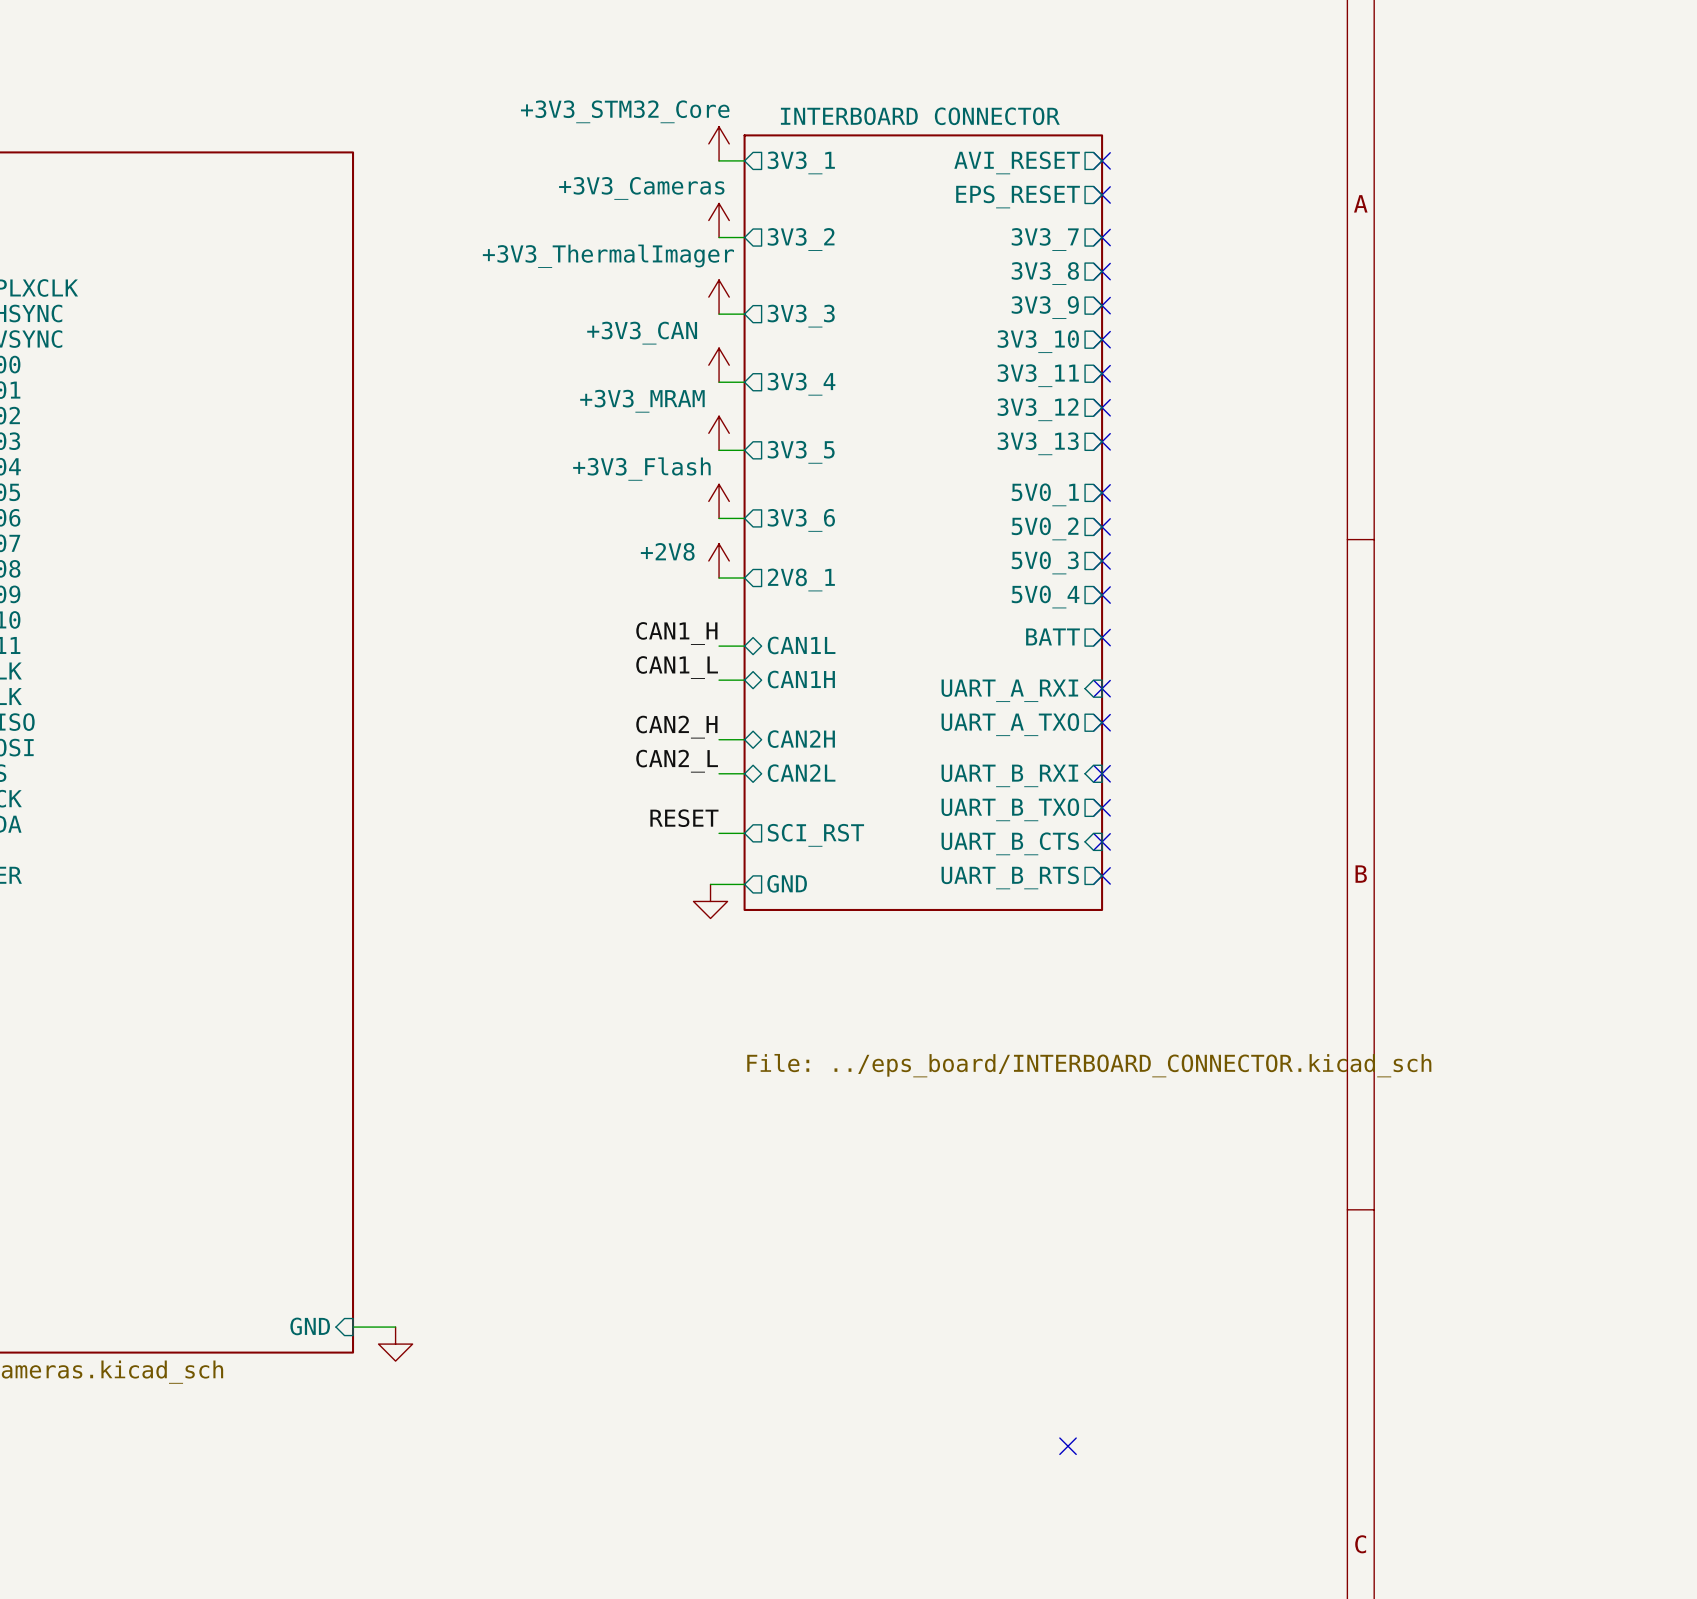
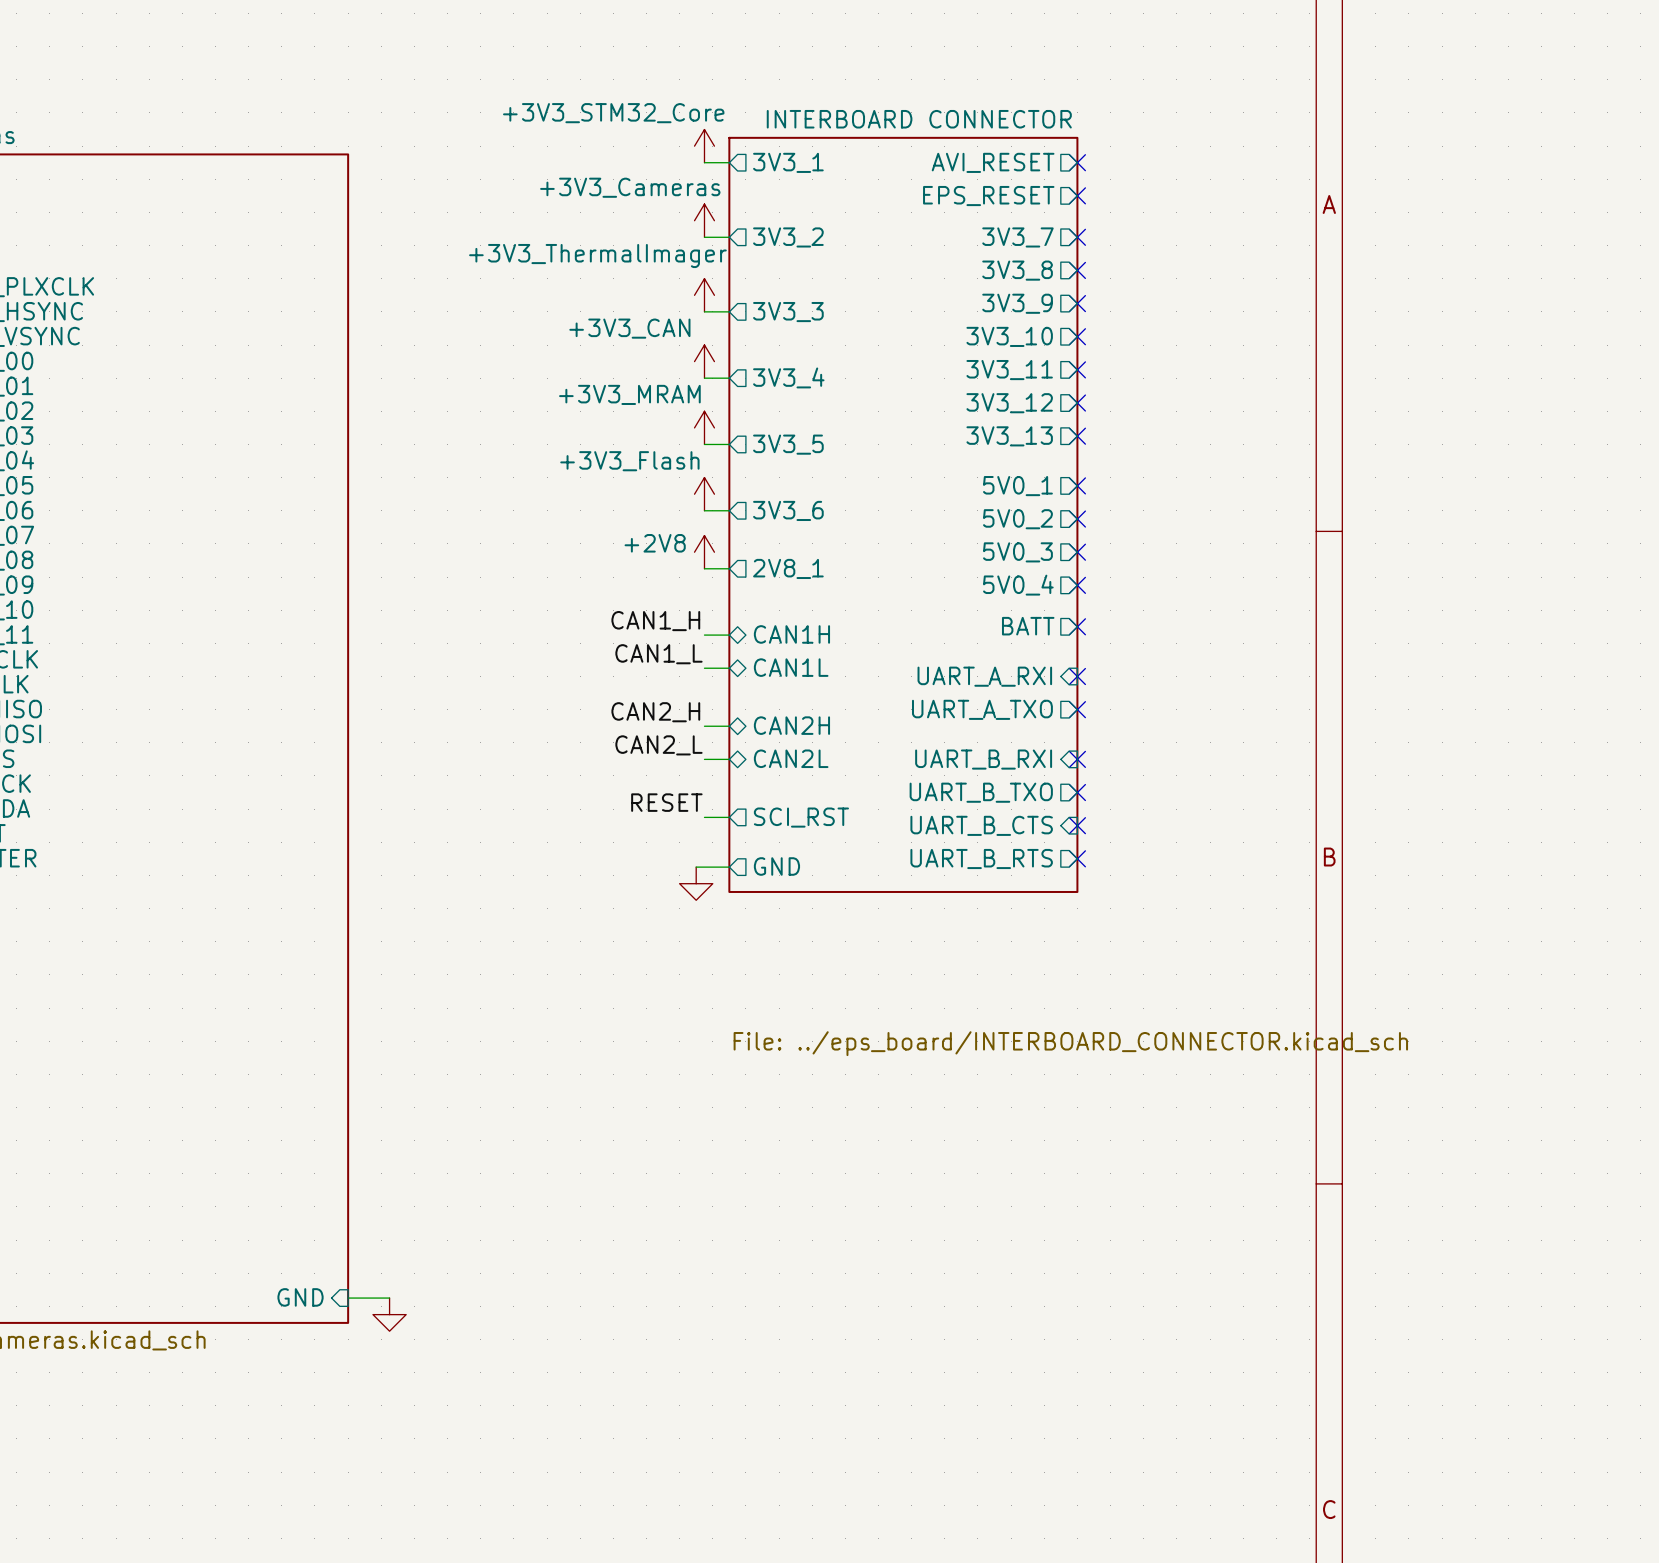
sheet pin: CAN1L (801, 645) -> CAN1H (791, 634)
sheet pin: CAN1H (801, 679) -> CAN1L (791, 667)
no-connect mark: (1068, 1446) -> none

